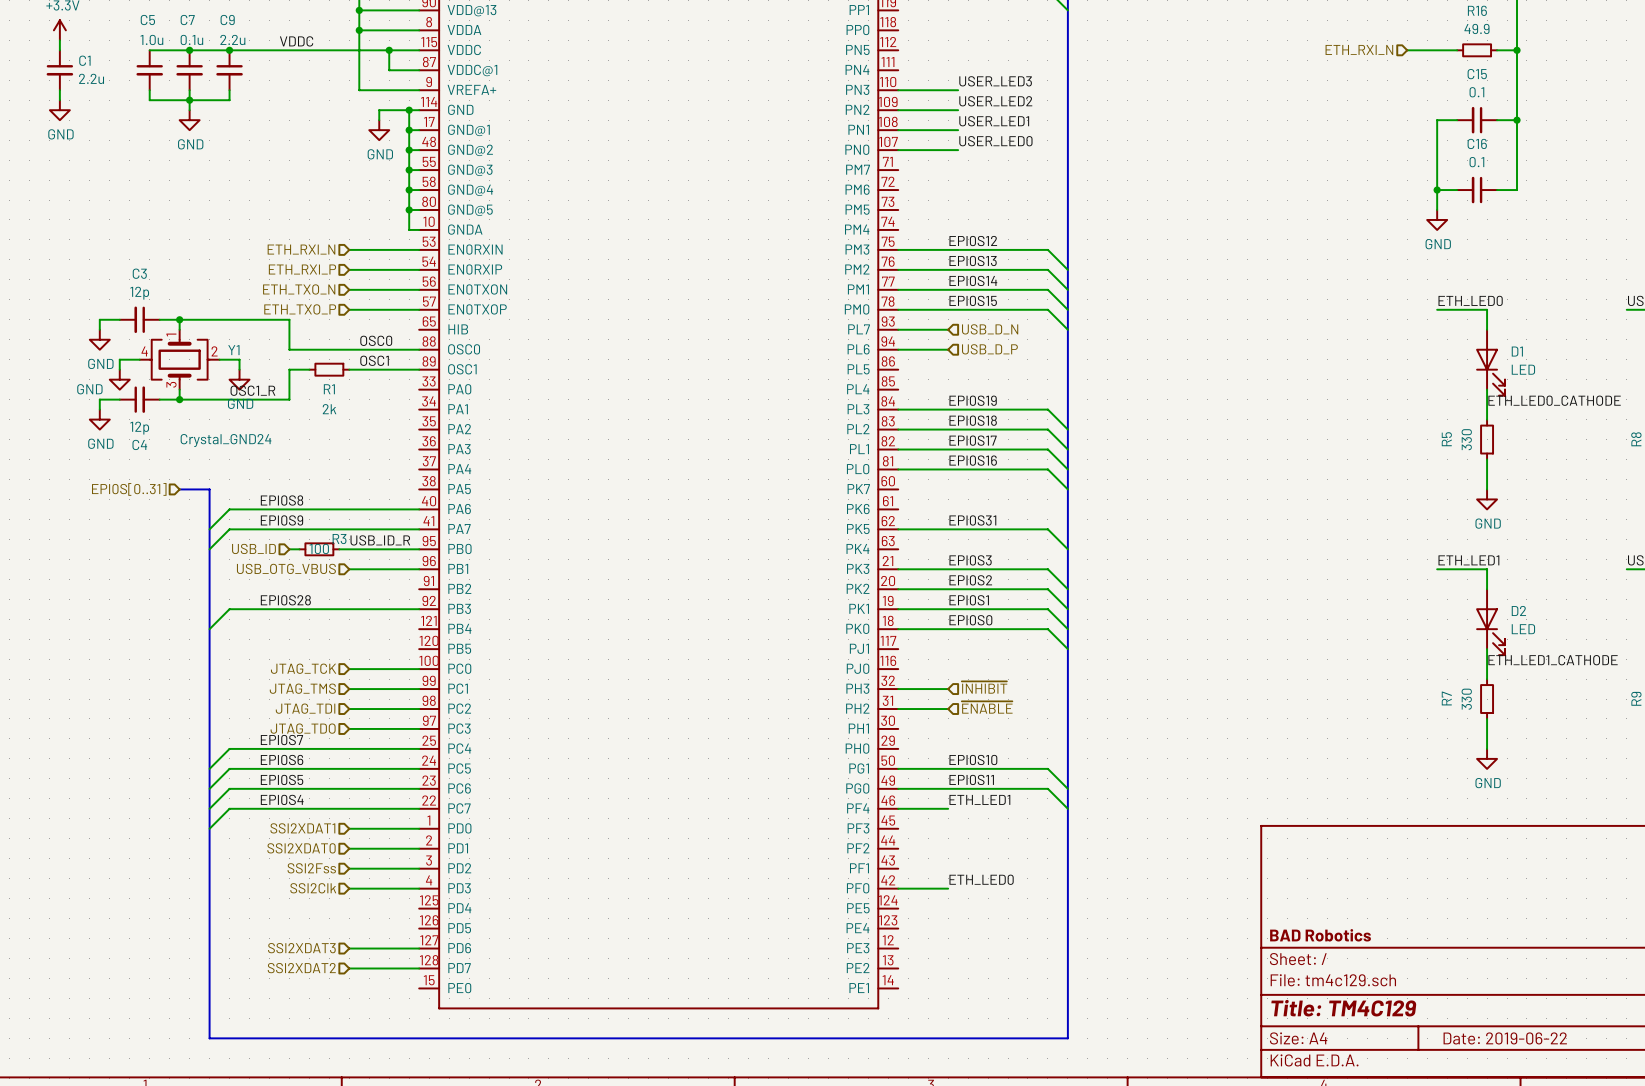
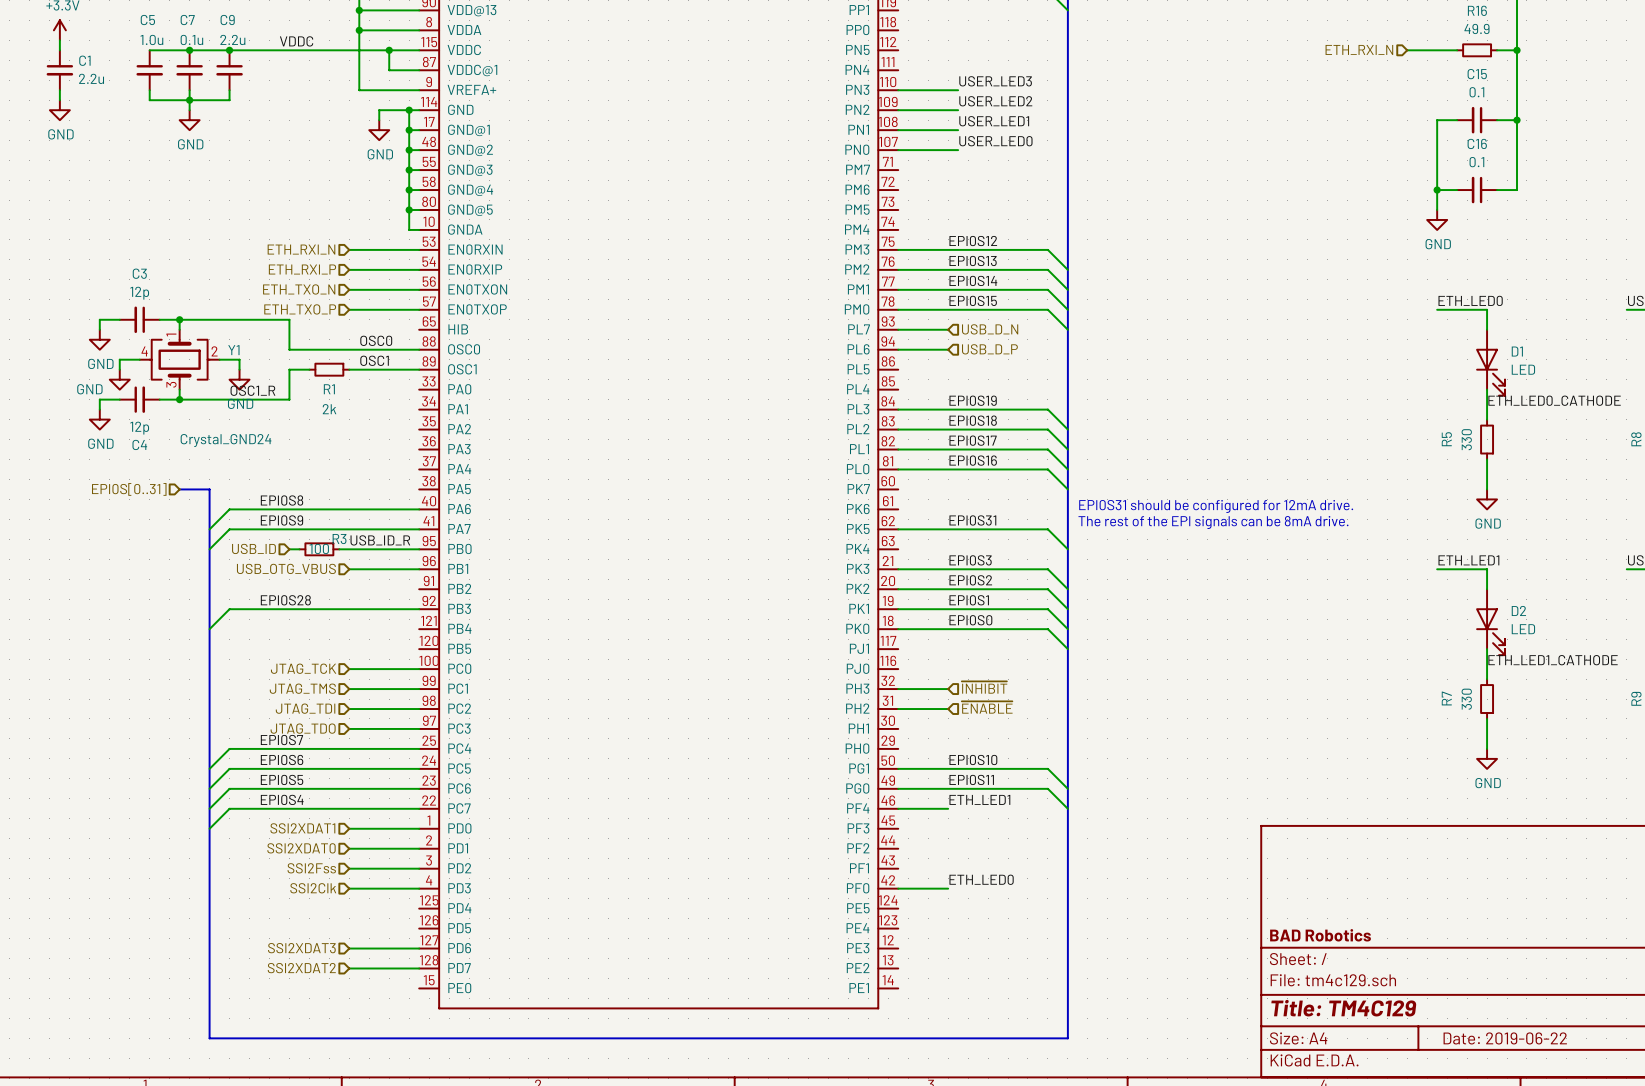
text: none -> EPI0S31 should be configured for 12mA drive. (1216, 506)
text: none -> The rest of the EPI signals can be 8mA drive. (1213, 522)

